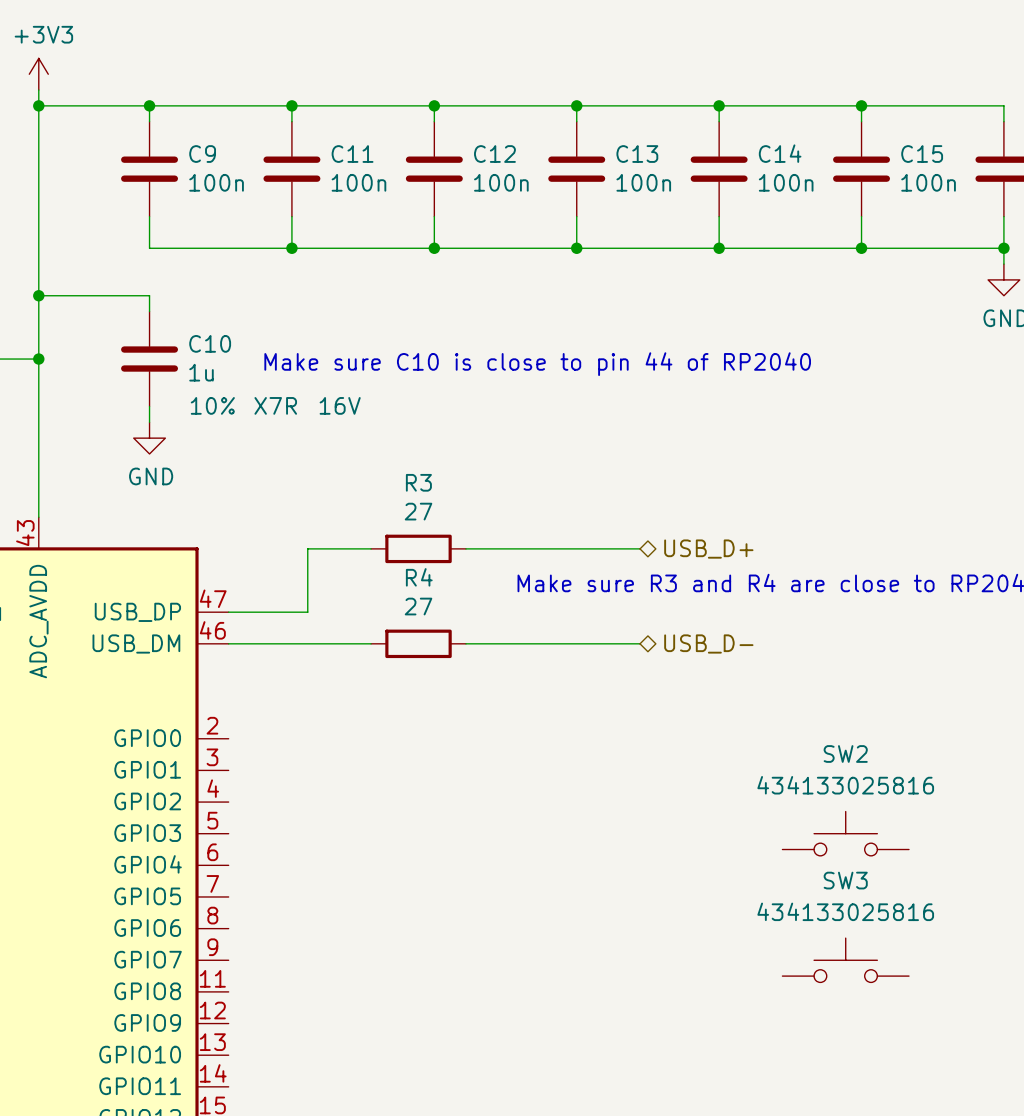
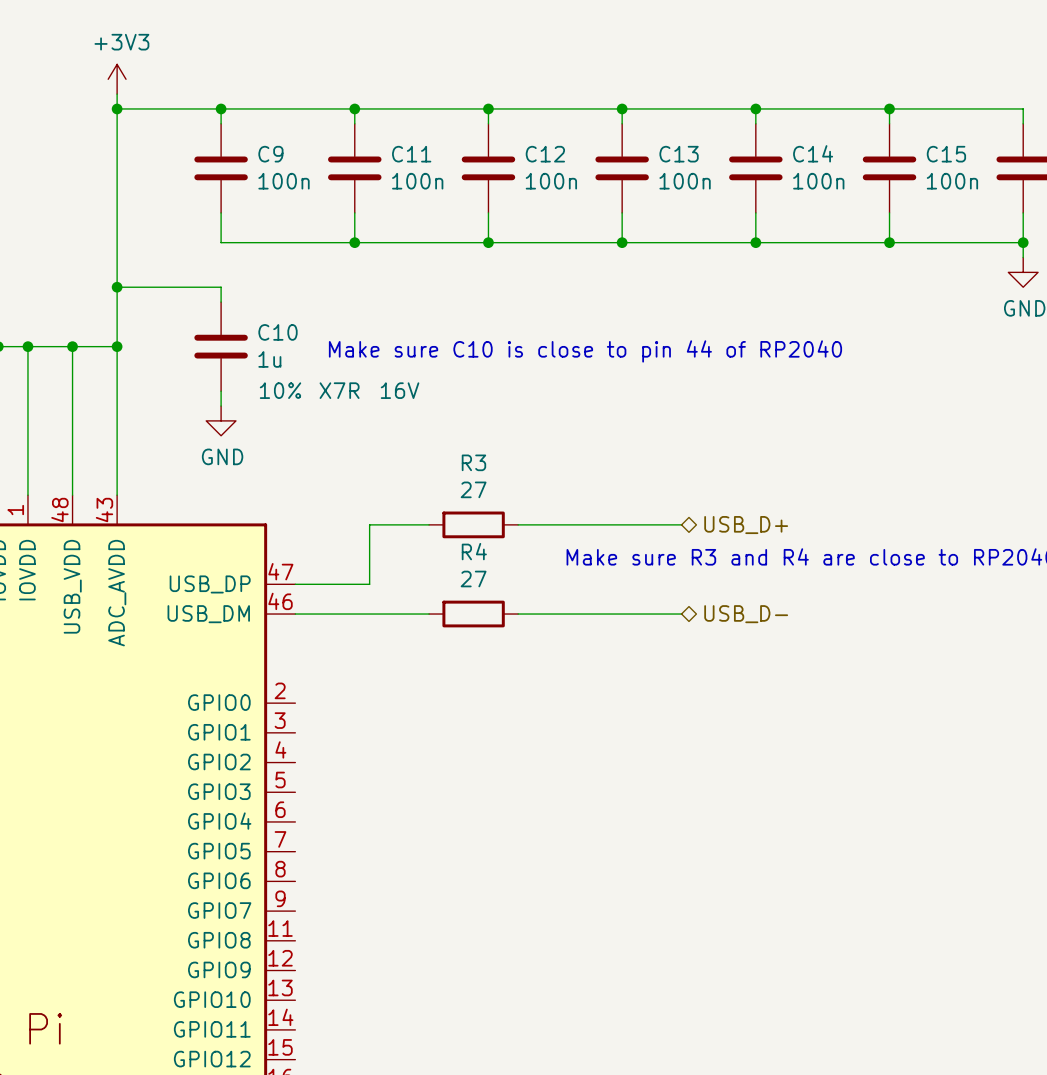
SW2: 434133025816 (845, 833) -> none
SW3: 434133025816 (845, 960) -> none

